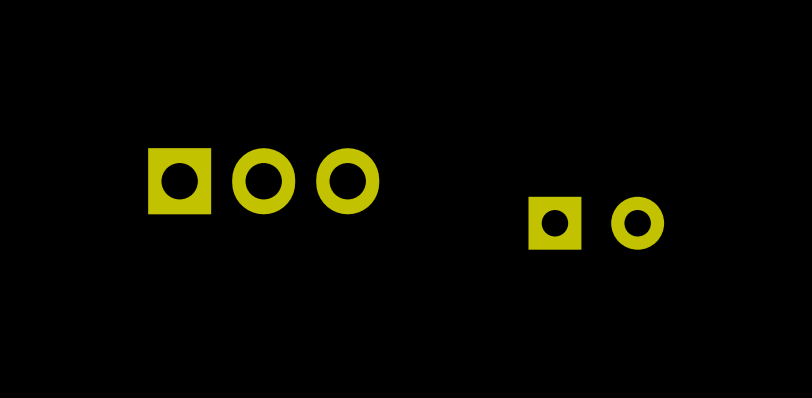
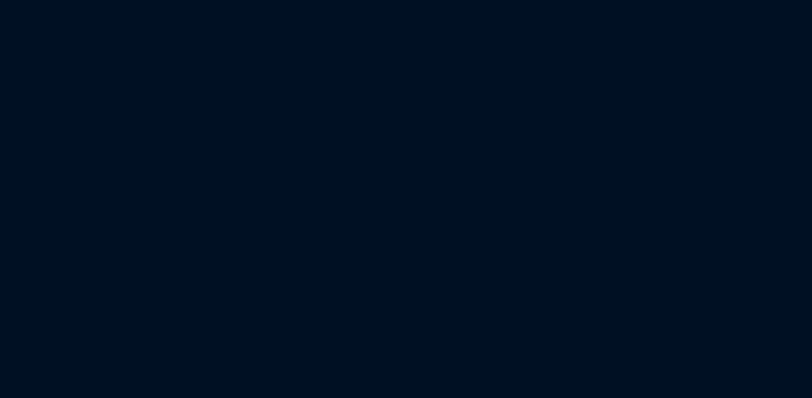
part: (263, 181) -> none
part: (596, 223) -> none

